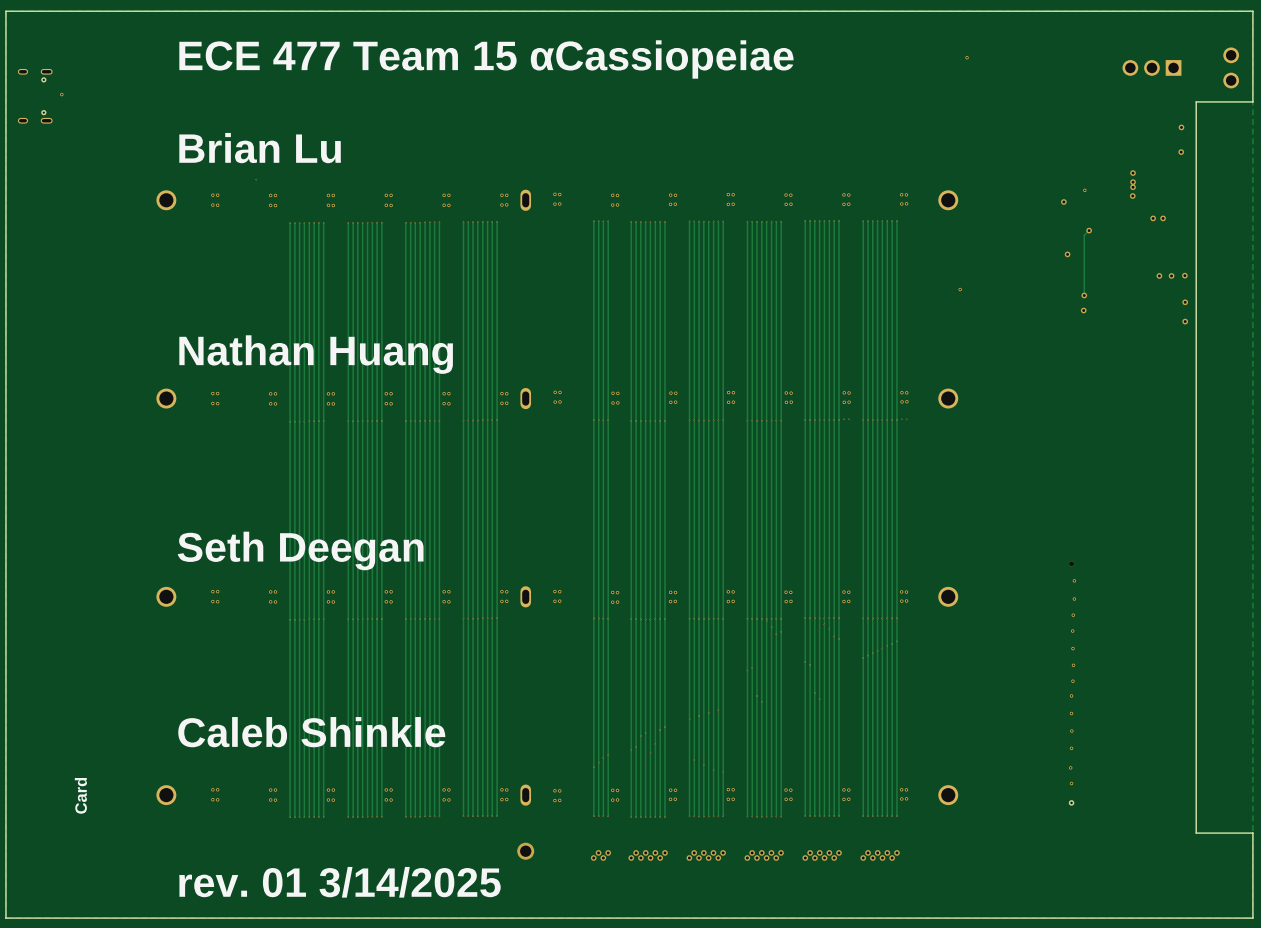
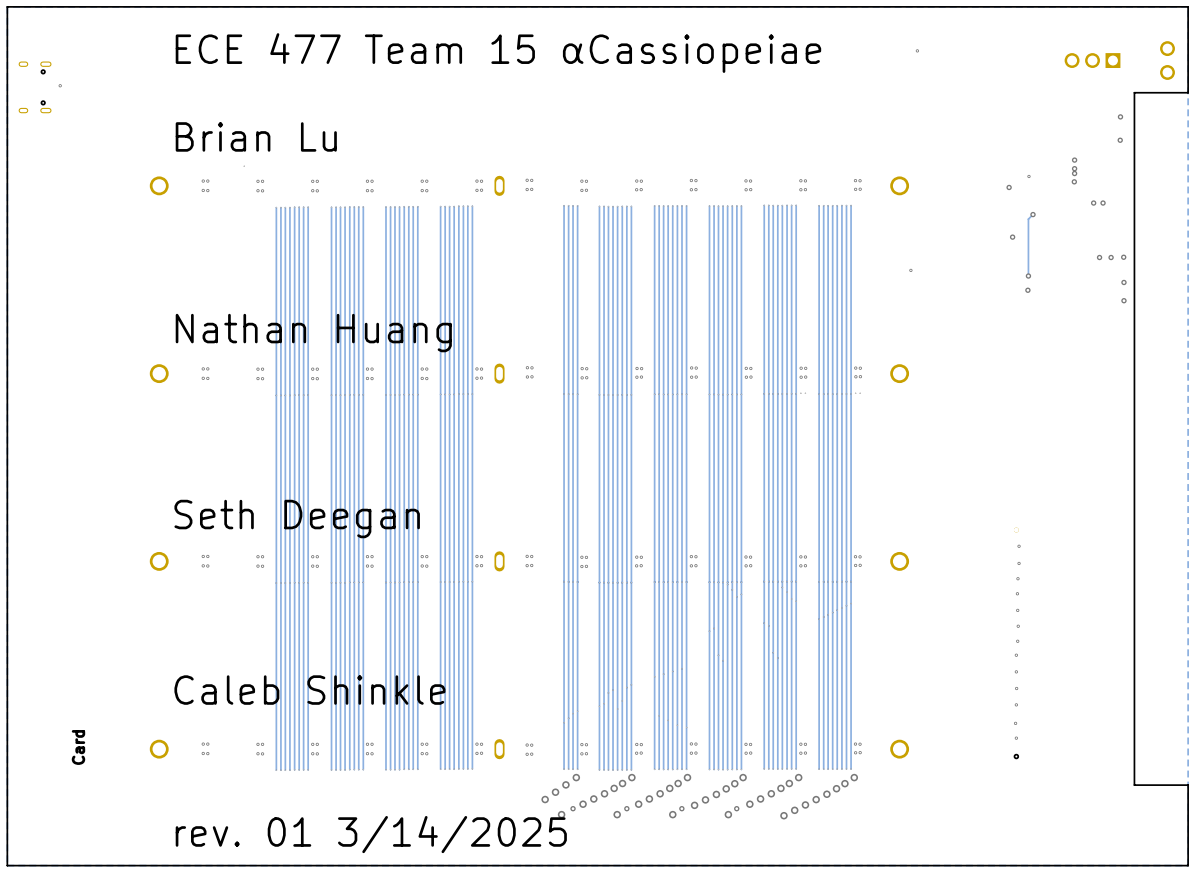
via: none -> (576, 777)
via: none -> (631, 777)
via: none -> (687, 777)
via: none -> (743, 777)
via: none -> (798, 777)
via: none -> (854, 777)
via: none -> (622, 783)
via: none -> (678, 783)
via: none -> (734, 783)
via: none -> (789, 783)
via: none -> (844, 783)
via: none -> (565, 784)
via: none -> (614, 788)
via: none -> (669, 788)
via: none -> (780, 788)
via: none -> (836, 788)
via: none -> (726, 788)
via: none -> (555, 792)
via: none -> (604, 793)
via: none -> (660, 793)
via: none -> (716, 794)
via: none -> (771, 793)
via: none -> (826, 794)
via: none -> (593, 798)
via: none -> (649, 798)
via: none -> (760, 798)
via: none -> (545, 799)
via: none -> (705, 799)
via: none -> (816, 799)
via: (525, 851) -> none
via: (598, 852) -> none
via: (608, 852) -> none
via: (636, 852) -> none
via: (645, 852) -> none
via: (655, 852) -> none
via: (665, 852) -> none
via: (694, 852) -> none
via: (703, 852) -> none
via: (713, 852) -> none
via: (723, 852) -> none
via: (752, 852) -> none
via: (761, 852) -> none
via: (771, 852) -> none
via: (781, 852) -> none
via: (810, 852) -> none
via: (819, 852) -> none
via: (829, 852) -> none
via: (839, 852) -> none
via: (868, 852) -> none
via: (877, 852) -> none
via: (887, 852) -> none
via: (896, 852) -> none
via: none -> (583, 804)
via: none -> (638, 804)
via: none -> (749, 804)
via: none -> (694, 805)
via: none -> (805, 804)
via: (593, 858) -> none
via: (631, 858) -> none
via: (640, 858) -> none
via: (650, 858) -> none
via: (689, 858) -> none
via: (699, 858) -> none
via: (708, 858) -> none
via: (747, 858) -> none
via: (756, 858) -> none
via: (766, 858) -> none
via: (805, 858) -> none
via: (814, 858) -> none
via: (824, 858) -> none
via: (834, 858) -> none
via: (863, 858) -> none
via: (872, 858) -> none
via: (882, 858) -> none
via: (892, 858) -> none
via: none -> (794, 810)
via: none -> (561, 814)
via: none -> (617, 814)
via: none -> (672, 814)
via: none -> (728, 814)
via: none -> (783, 815)

